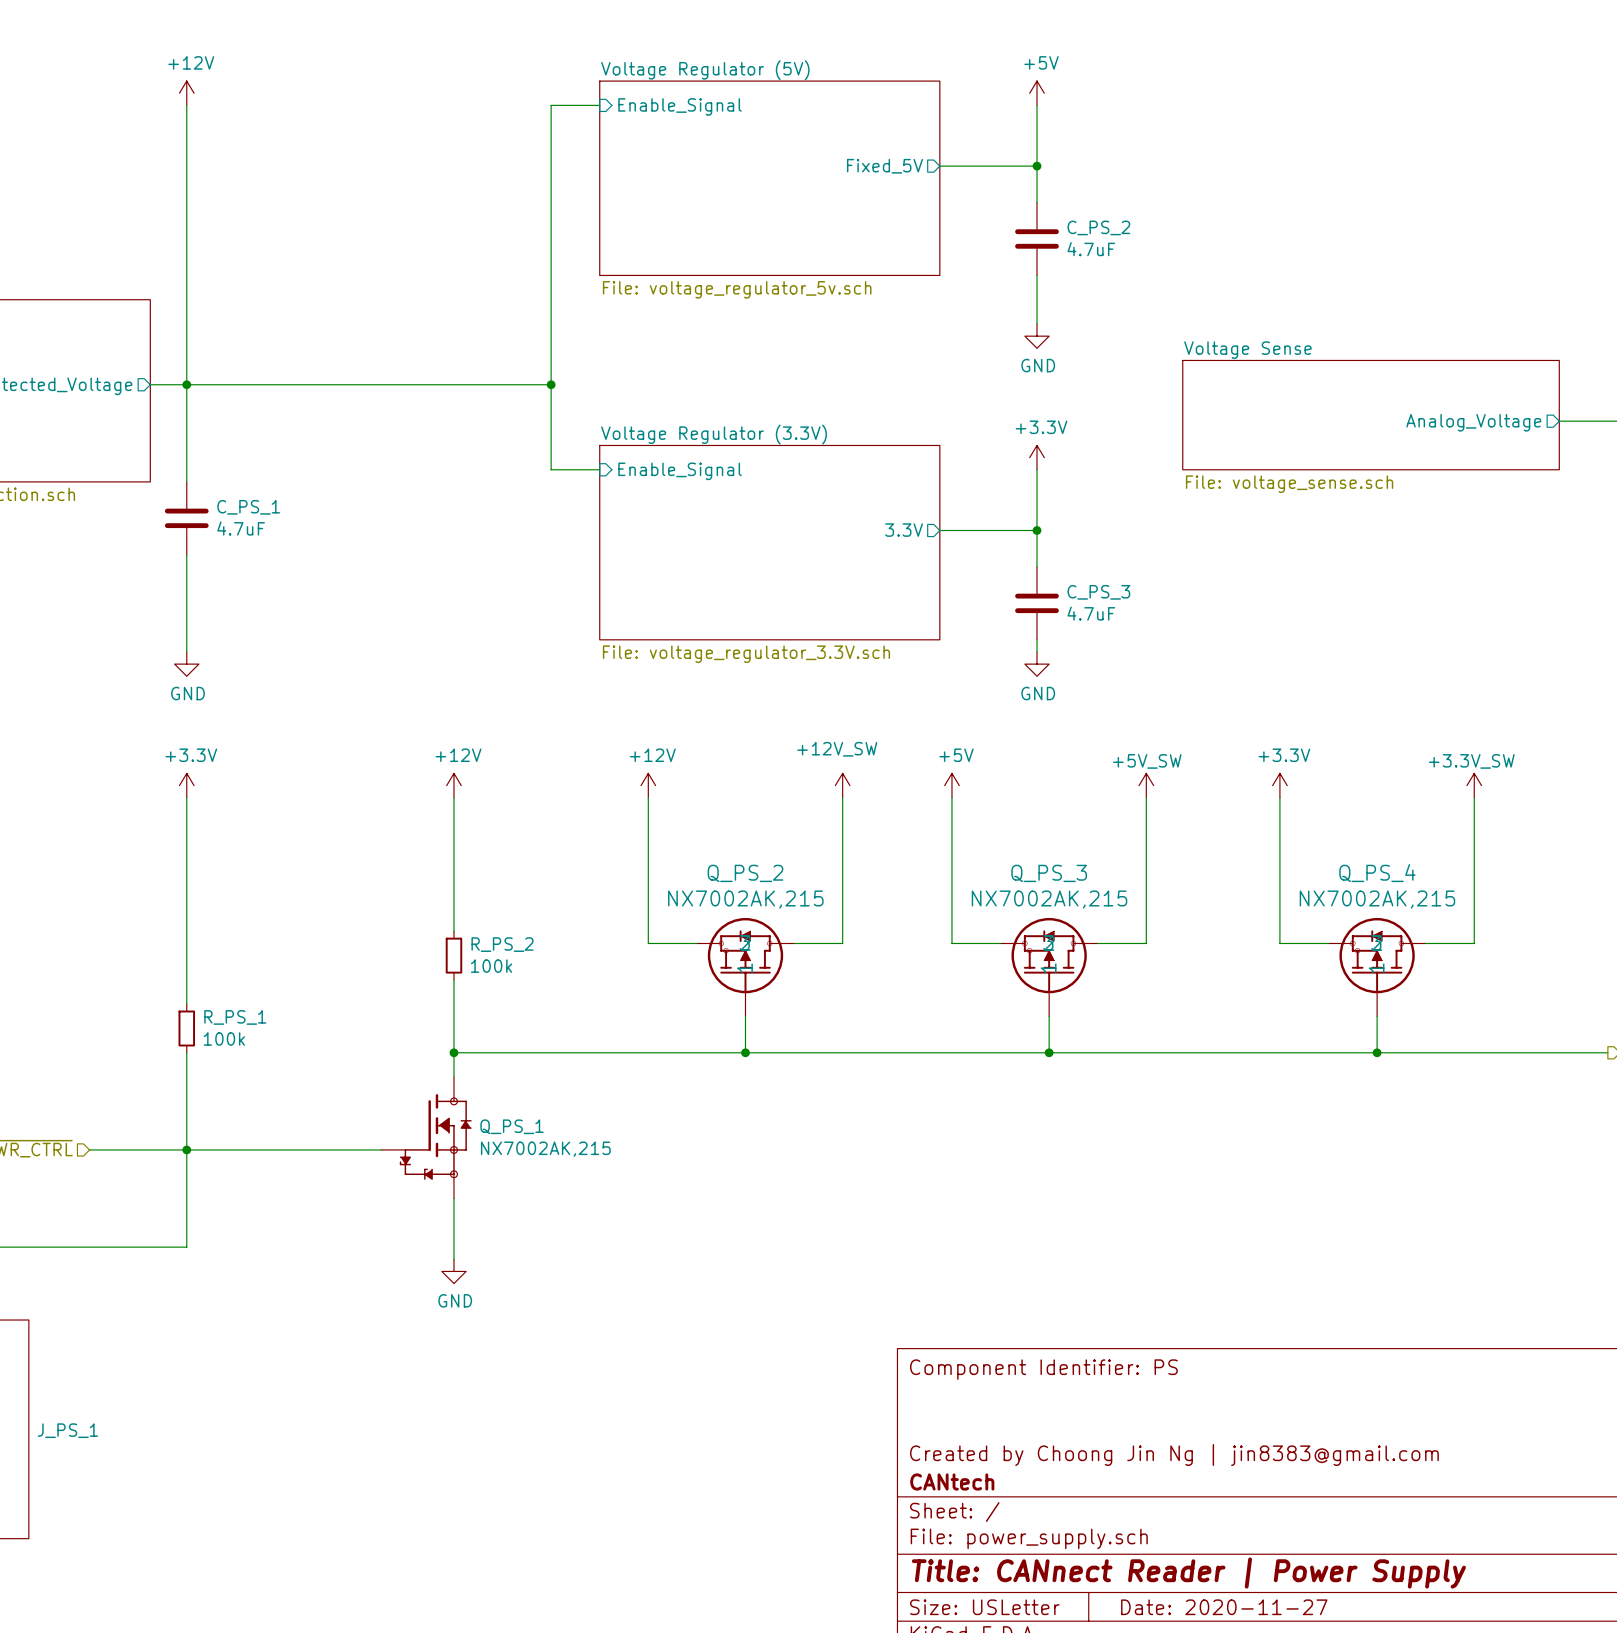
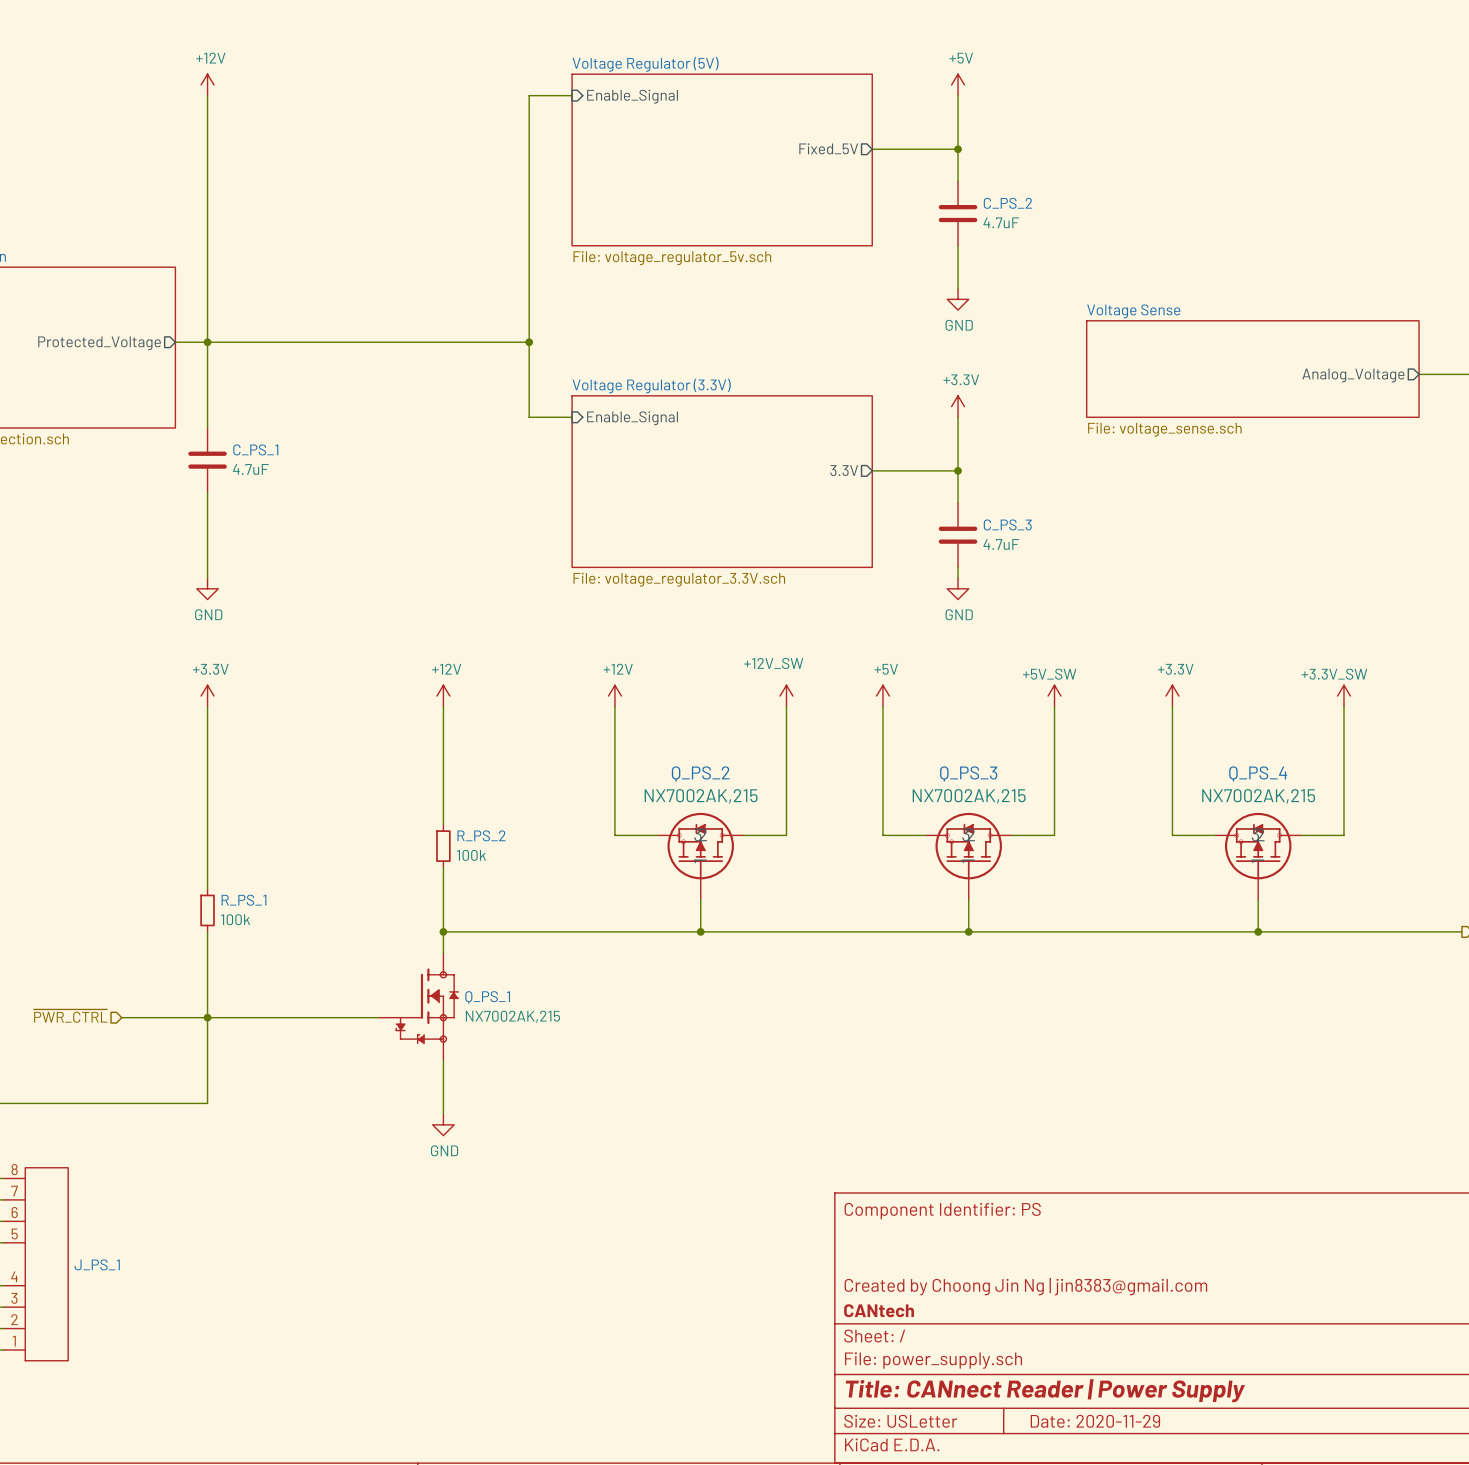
title block: Date: 2020-11-27 (1224, 1607) -> Date: 2020-11-29 (1095, 1421)

